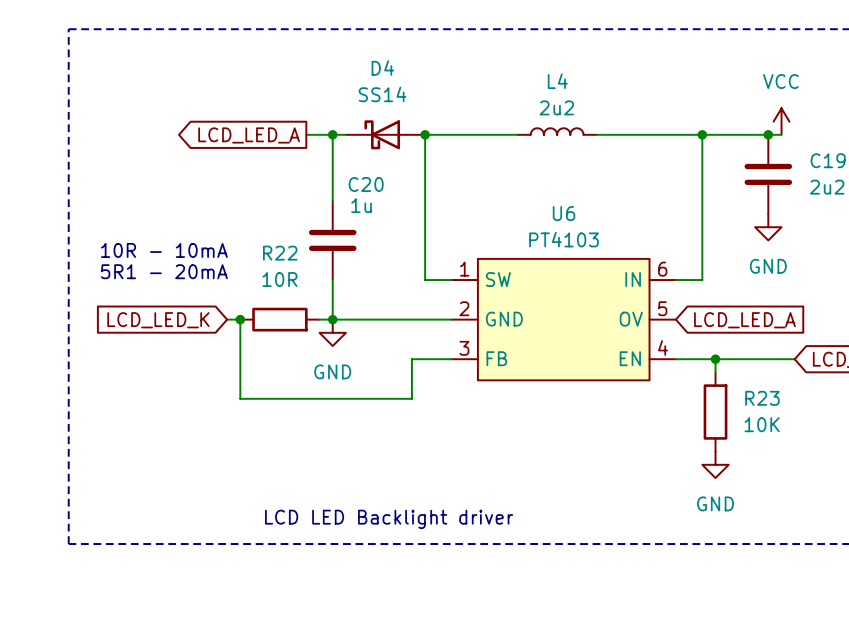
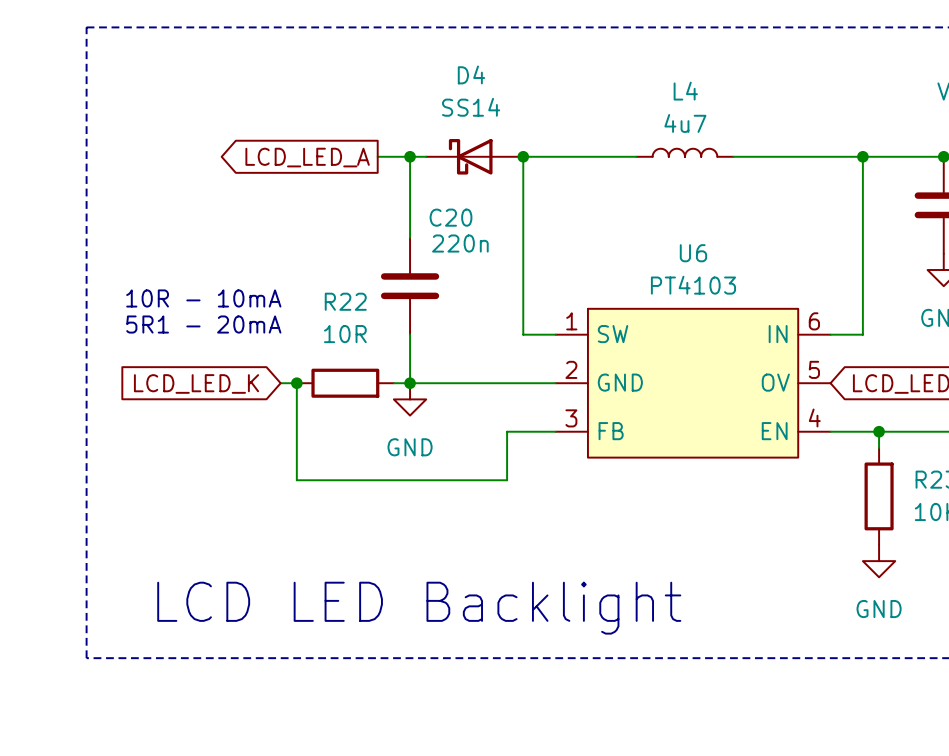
L4 value: 2u2 (556, 107) -> 4u7 (685, 123)
C20 value: 1u (361, 205) -> 220n (460, 243)
text: LCD LED Backlight driver (389, 519) -> LCD LED Backlight (419, 608)

